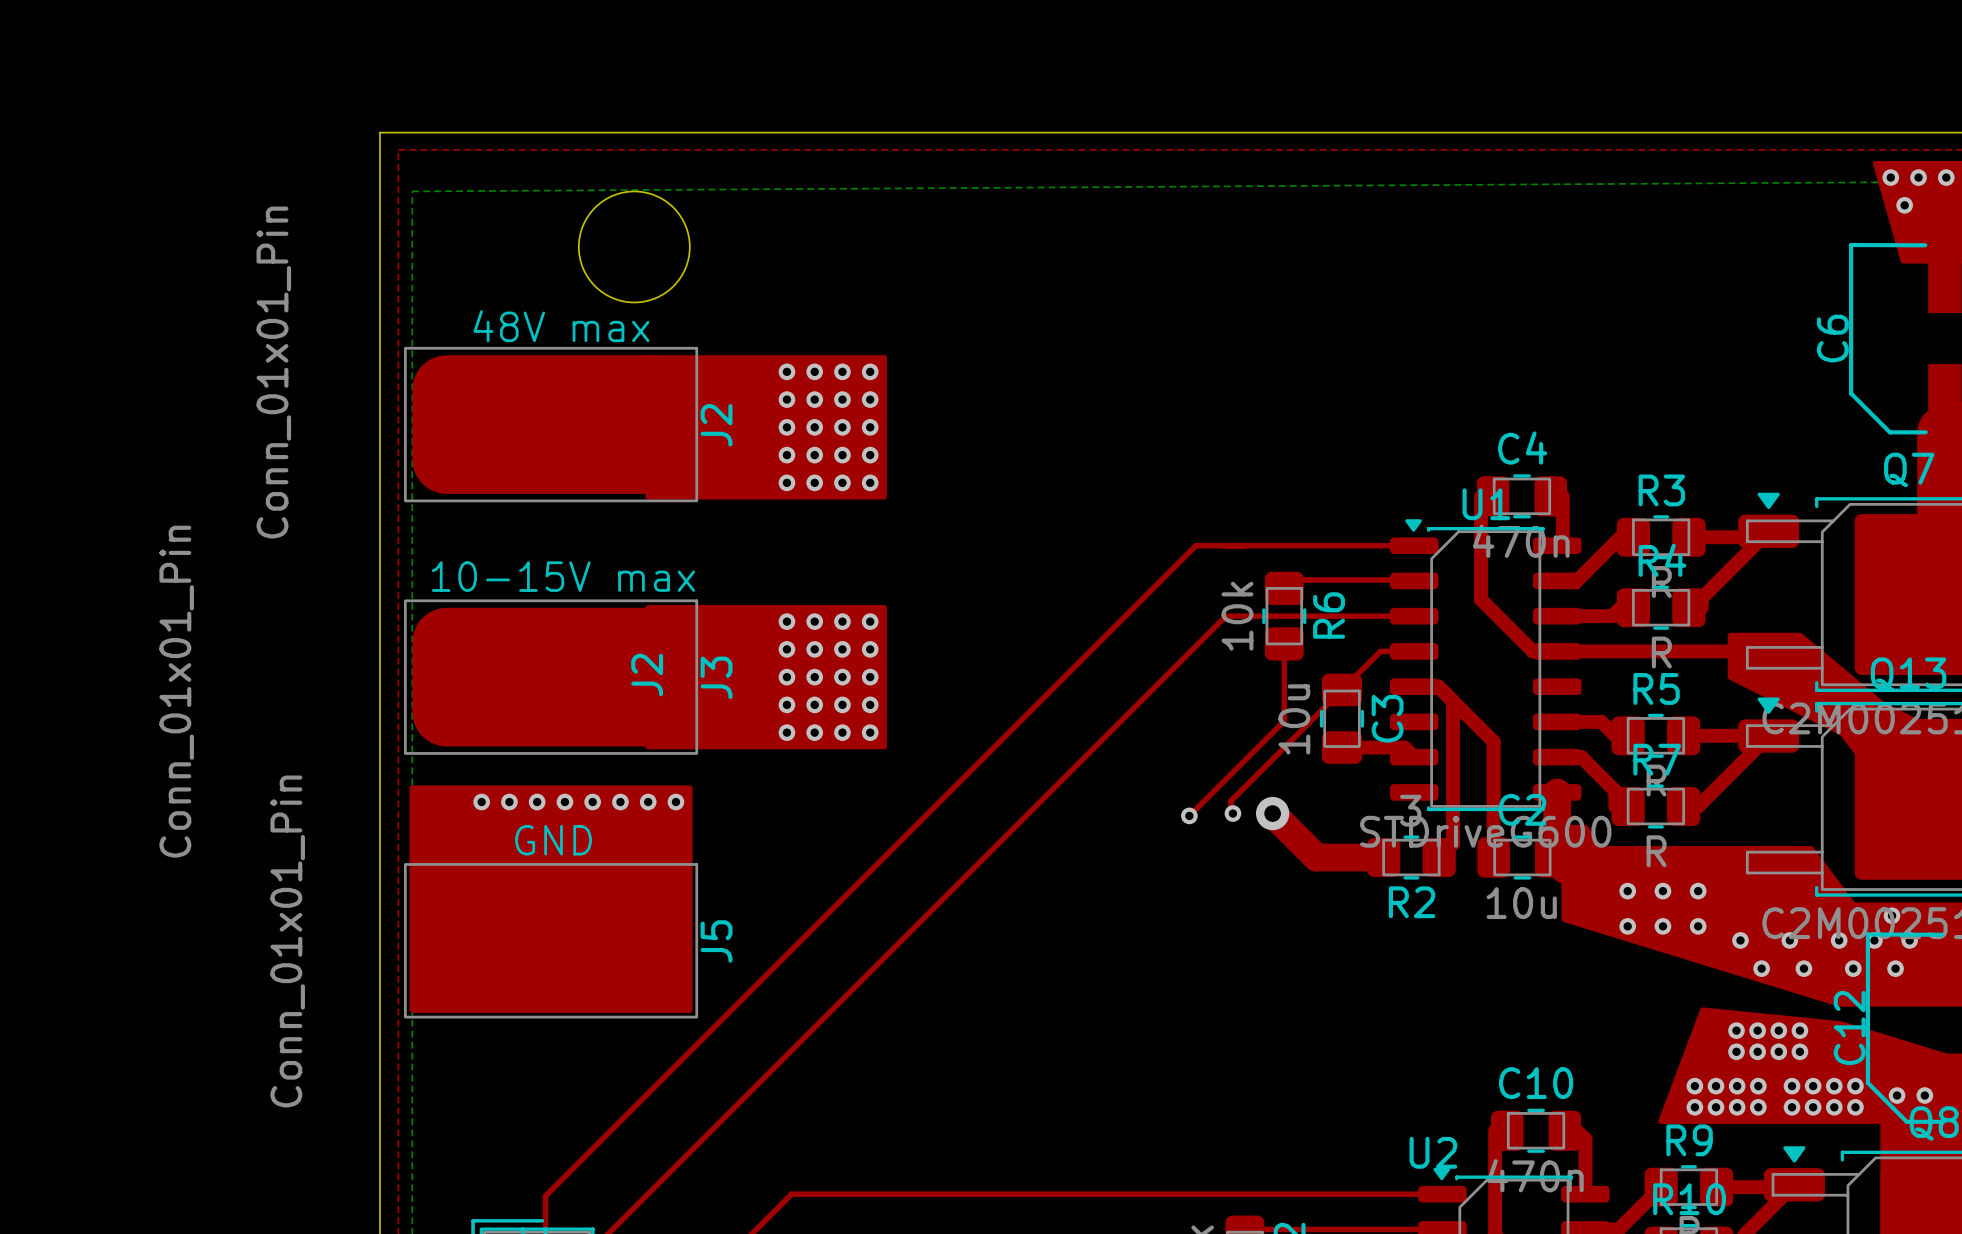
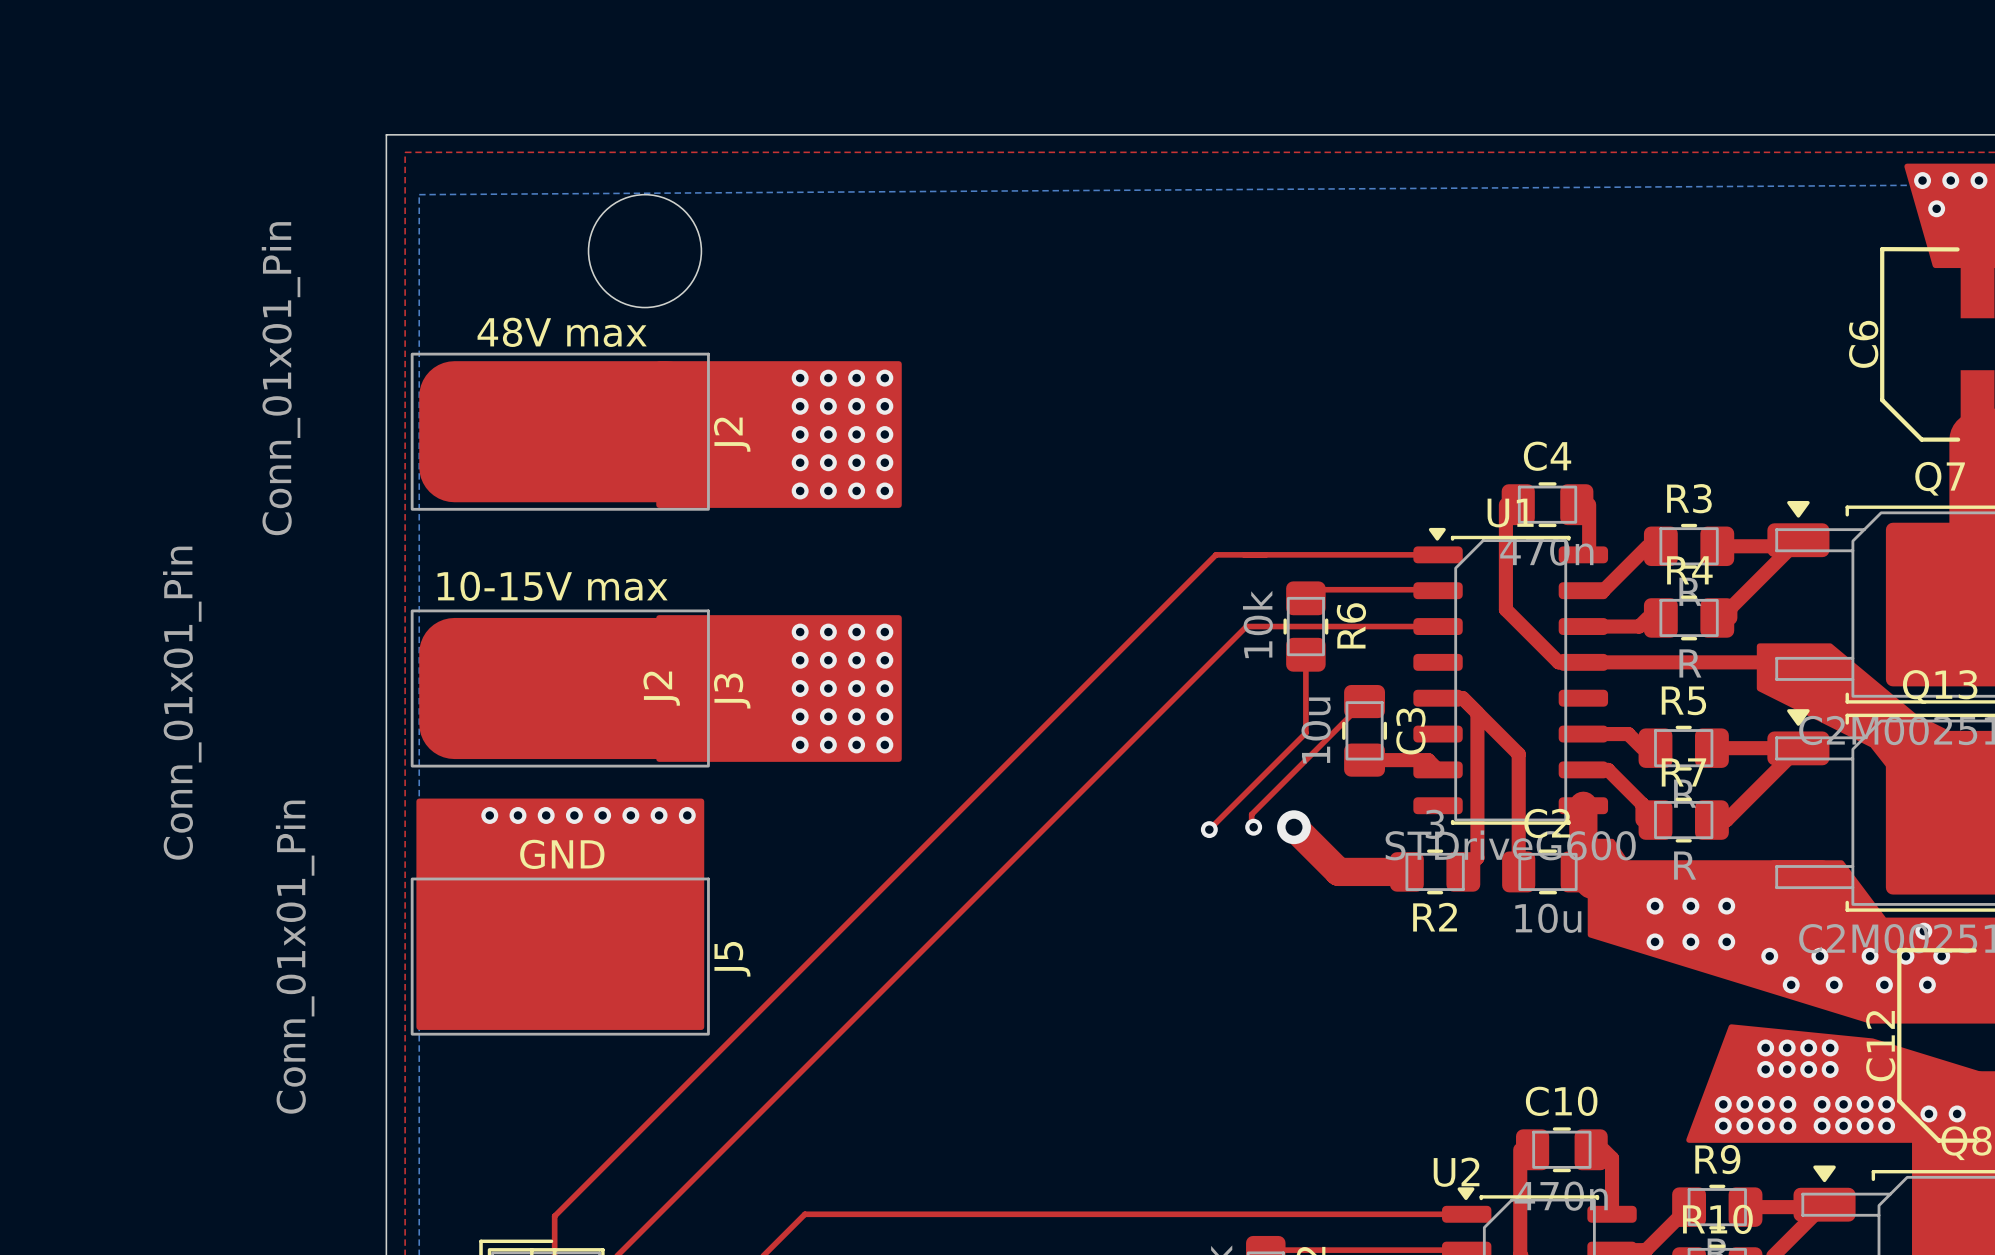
top track: (1414, 651) (1380, 651) (1342, 689) -> none

